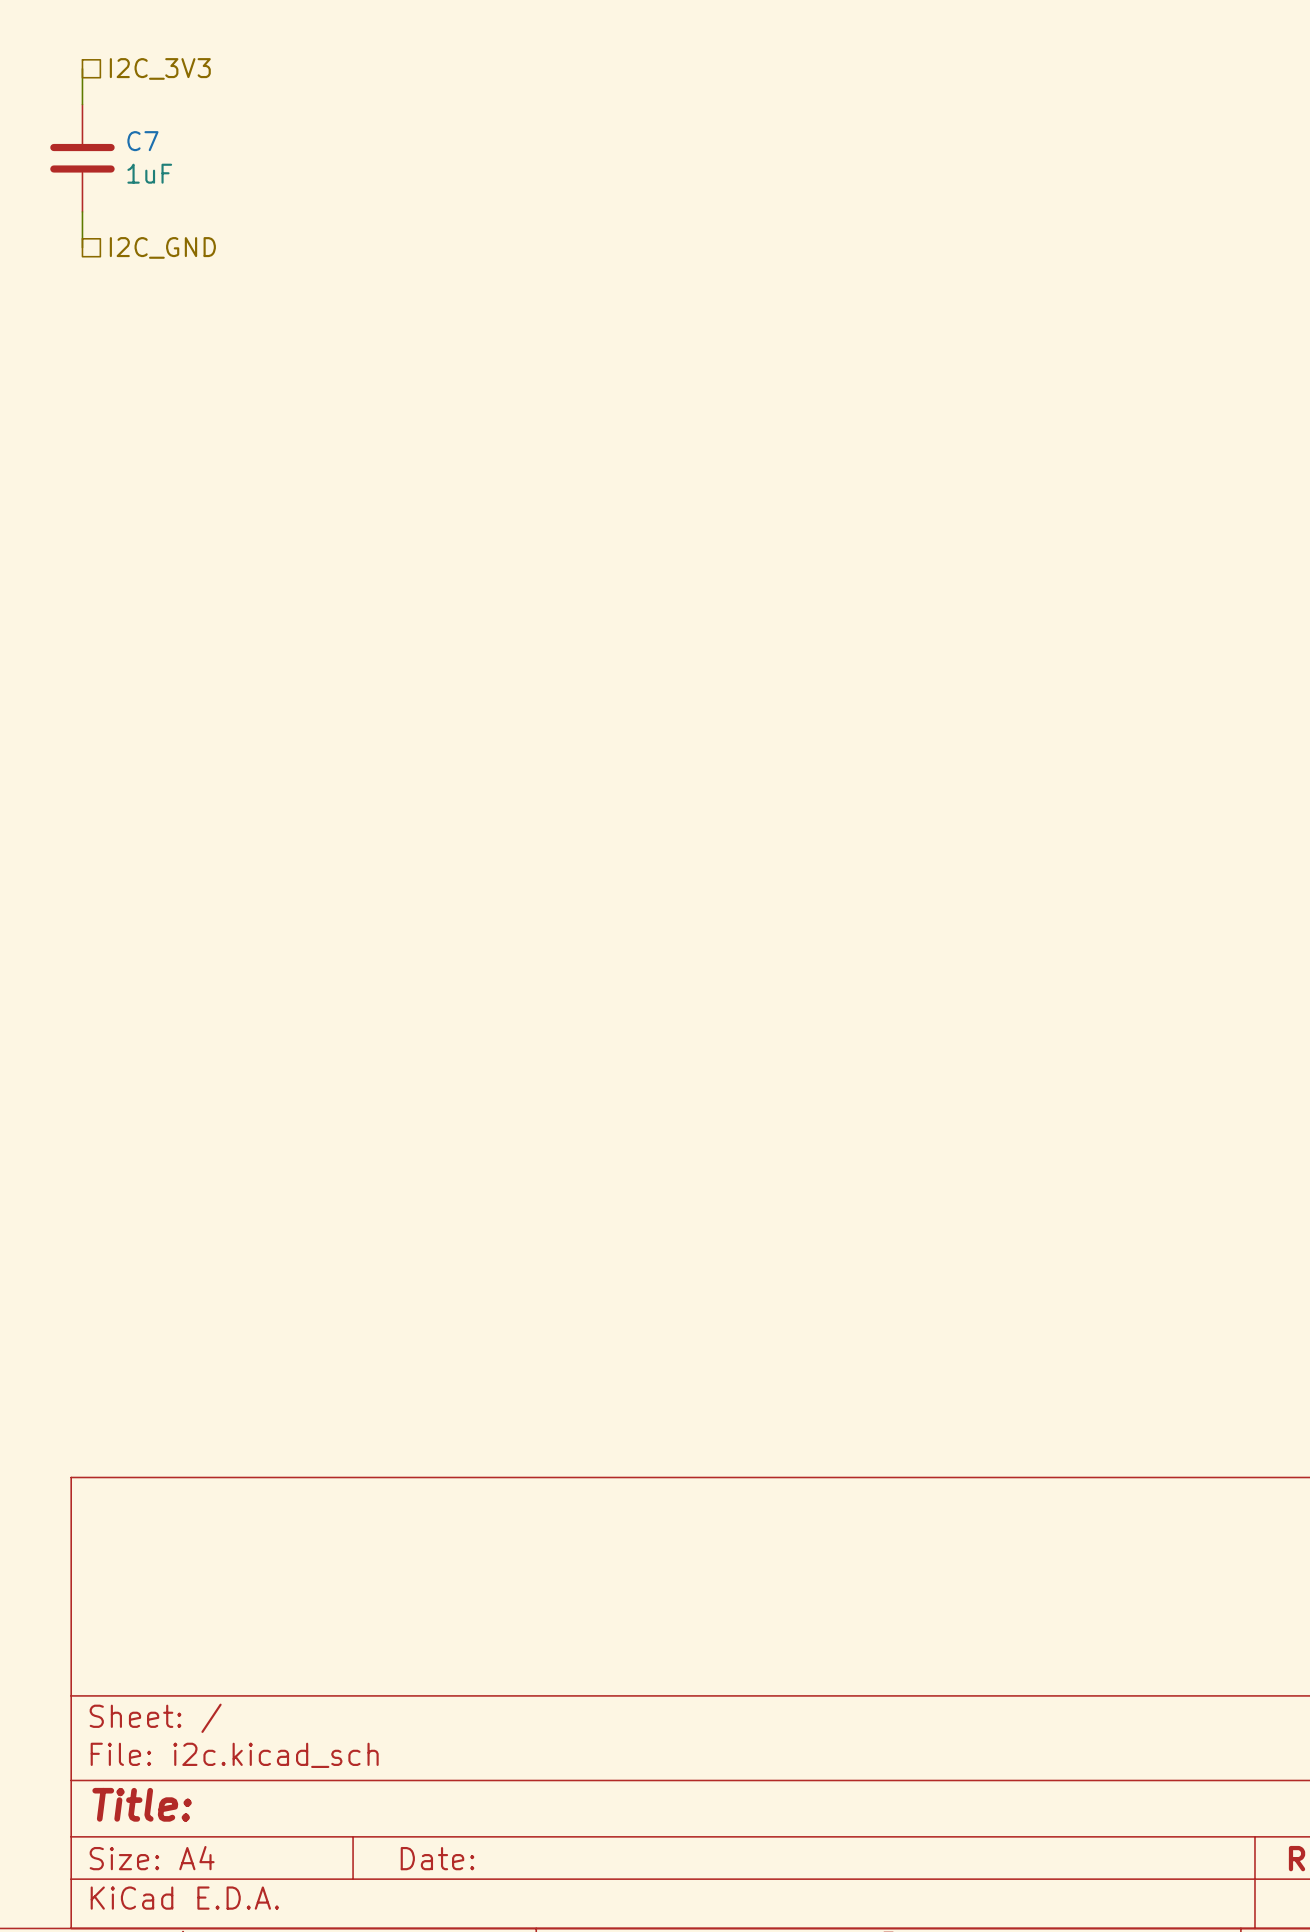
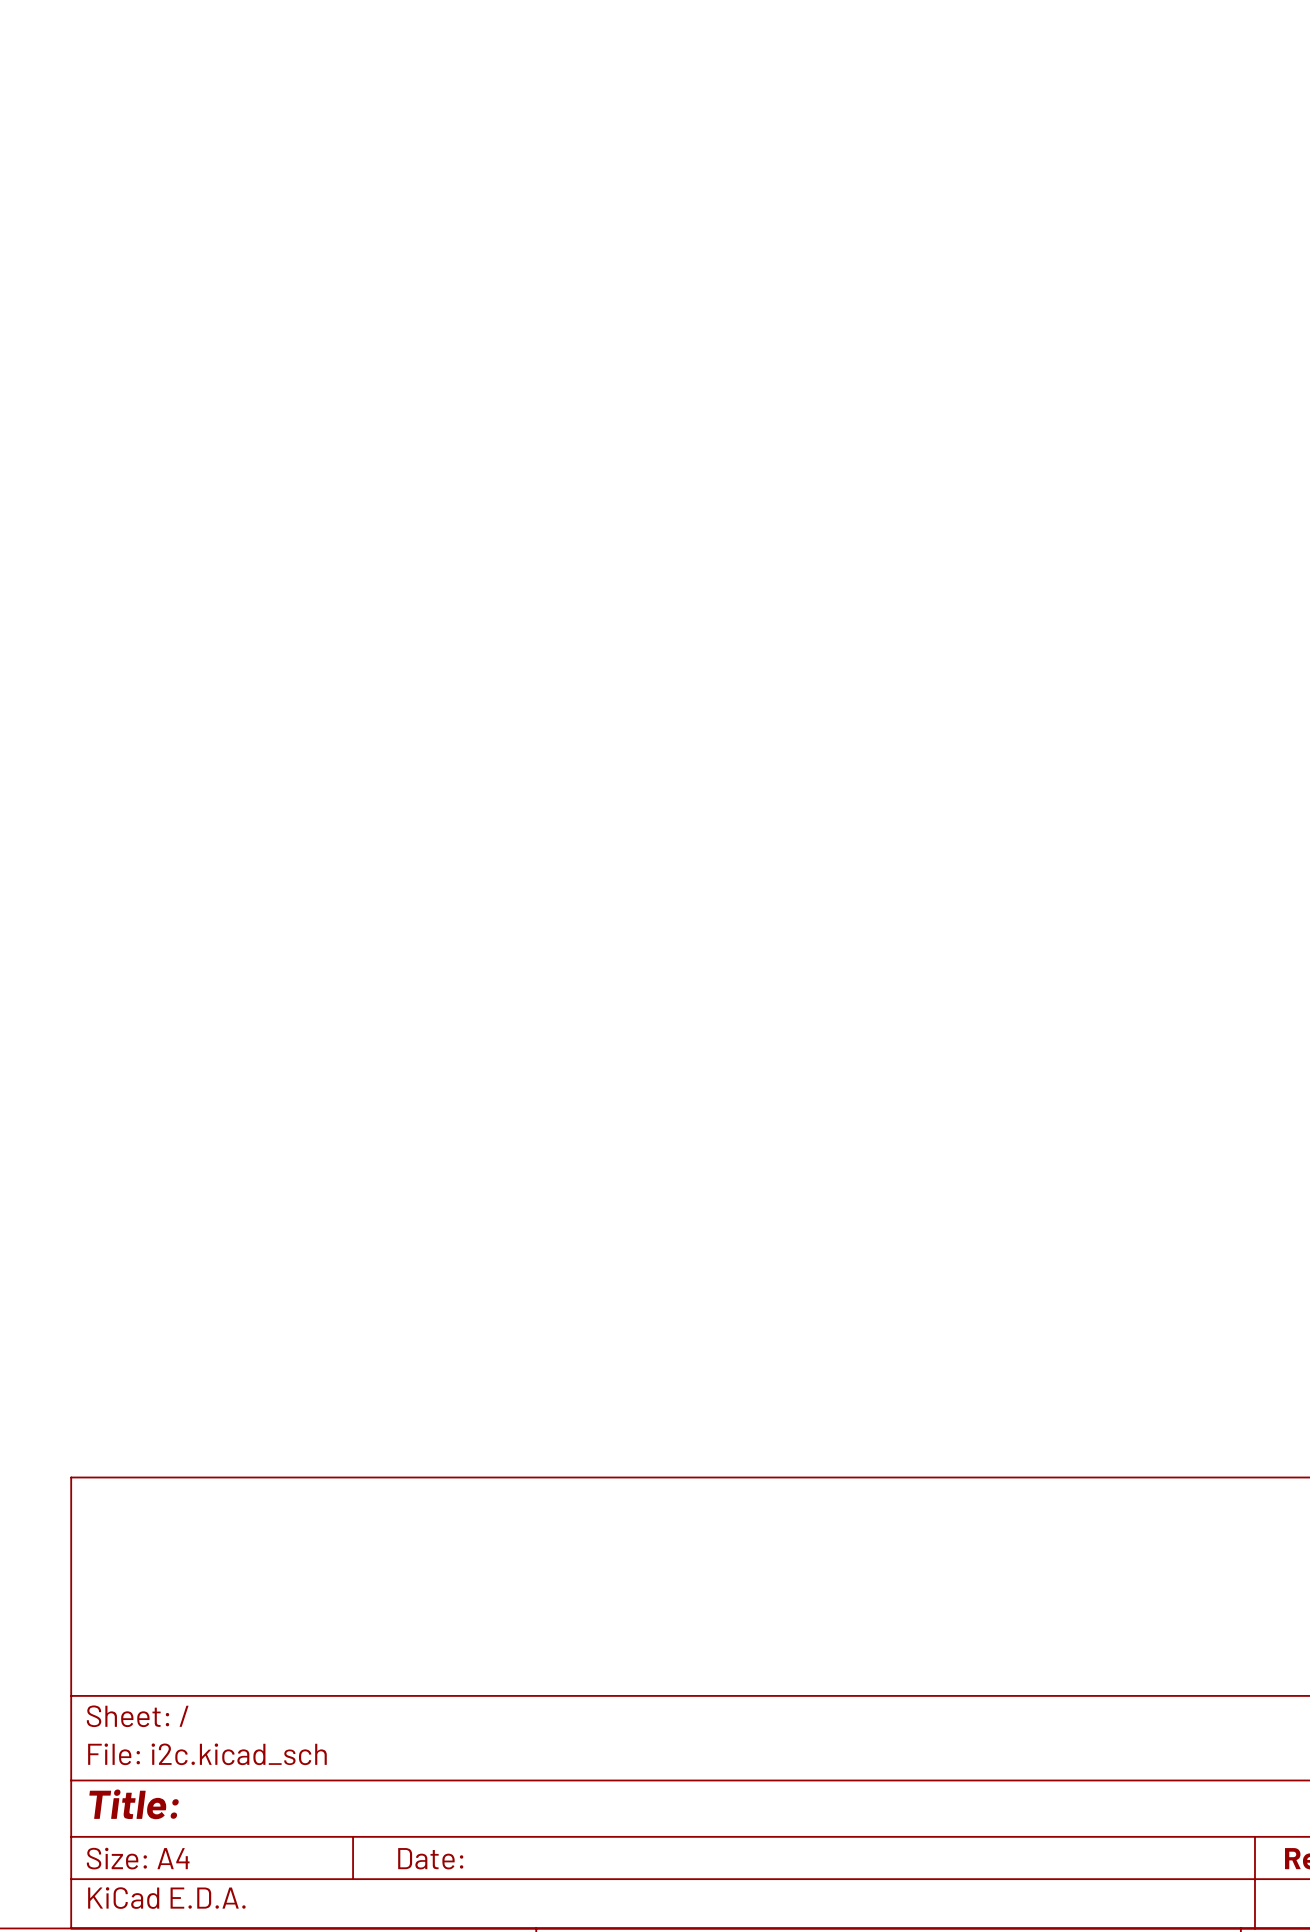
wire: (82, 68) (82, 104) -> none
hierarchical label: I2C_3V3 (160, 68) -> none
C7: 1uF (82, 158) -> none
wire: (82, 211) (82, 247) -> none
hierarchical label: I2C_GND (162, 247) -> none

